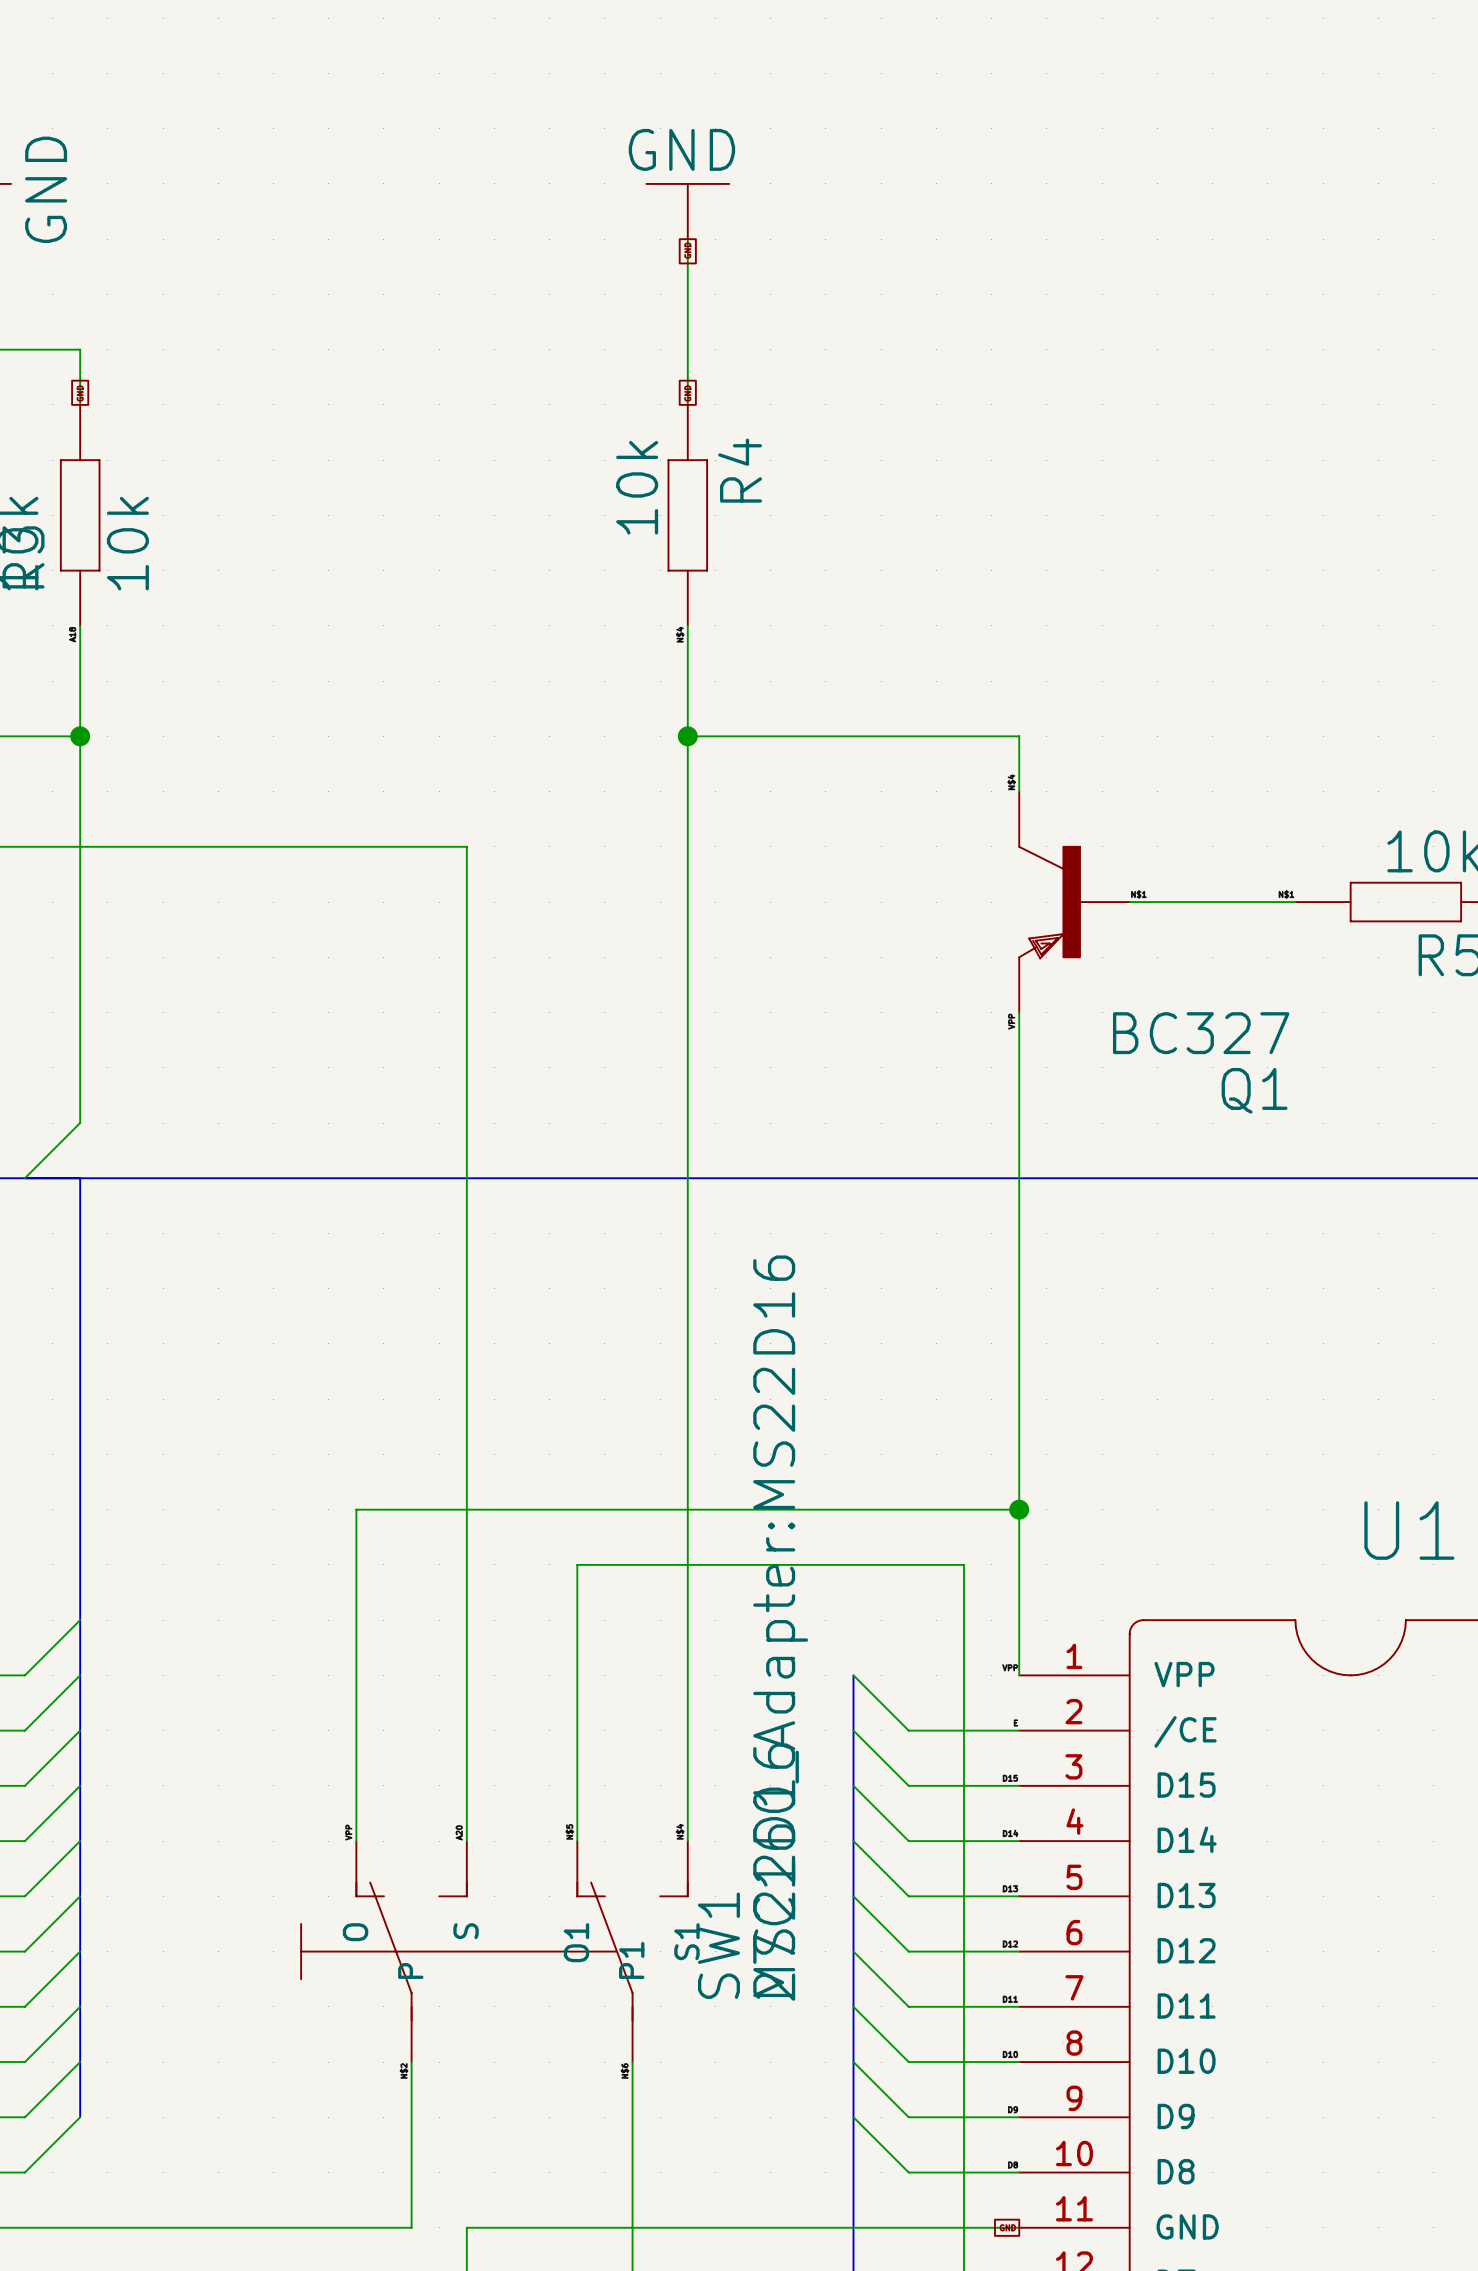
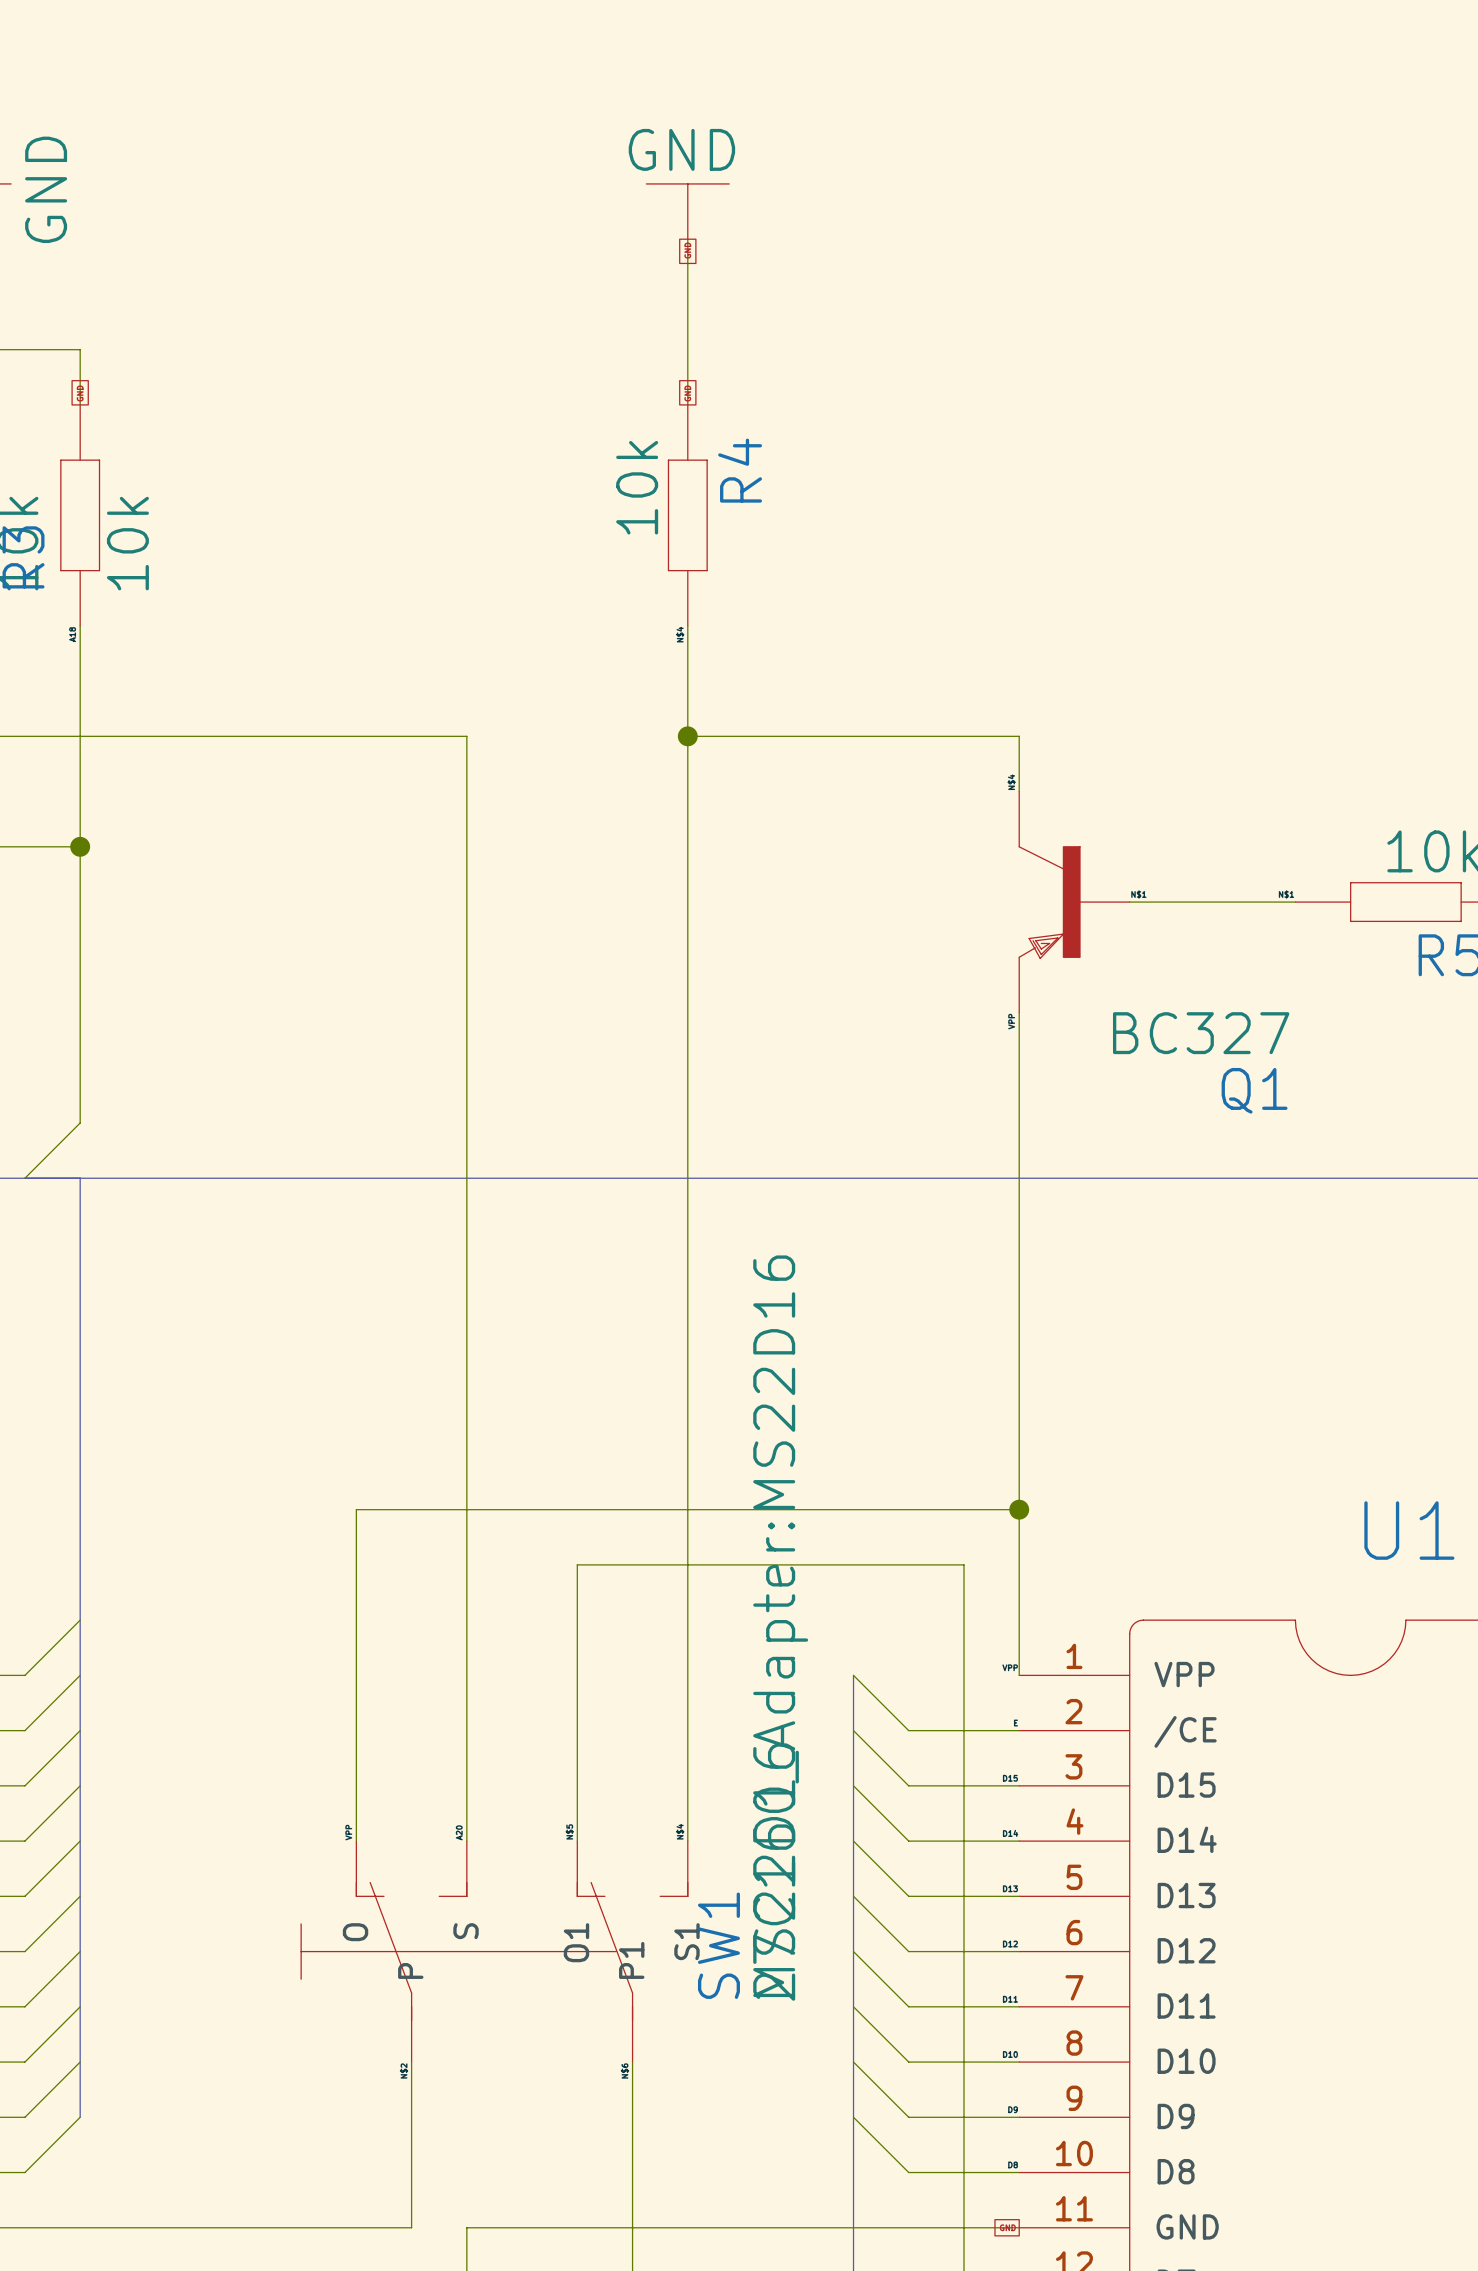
junction position: (80, 736) -> (80, 846)
wire: (80, 846) (466, 846) -> (80, 736) (466, 736) (466, 846)

